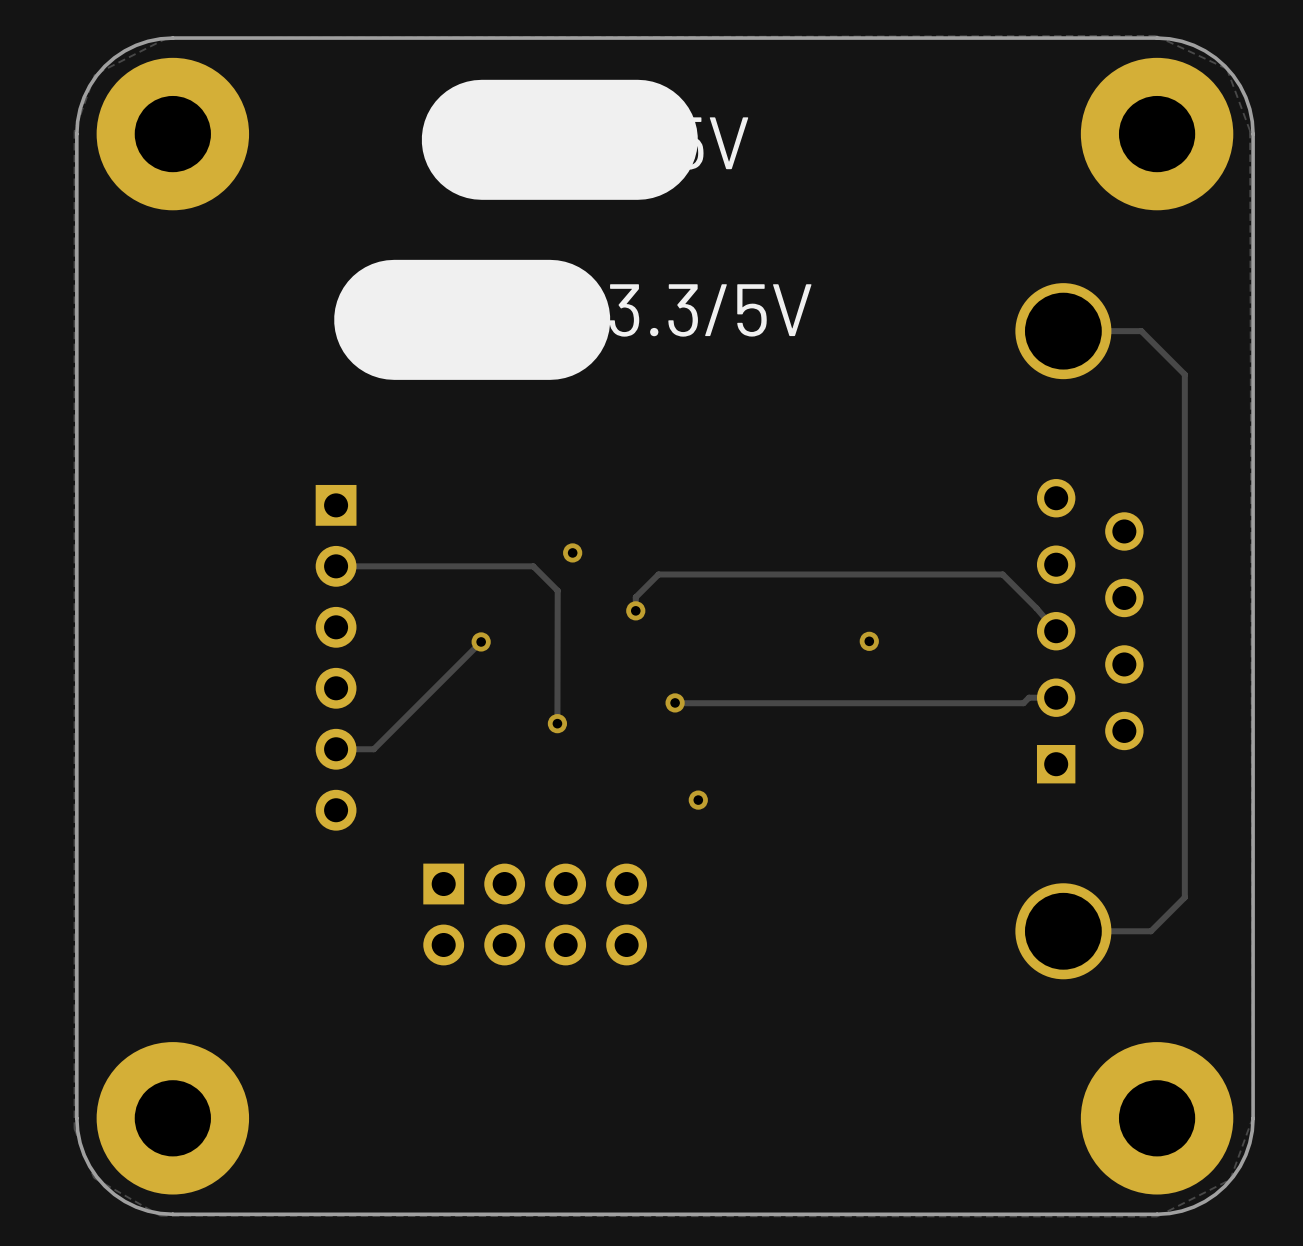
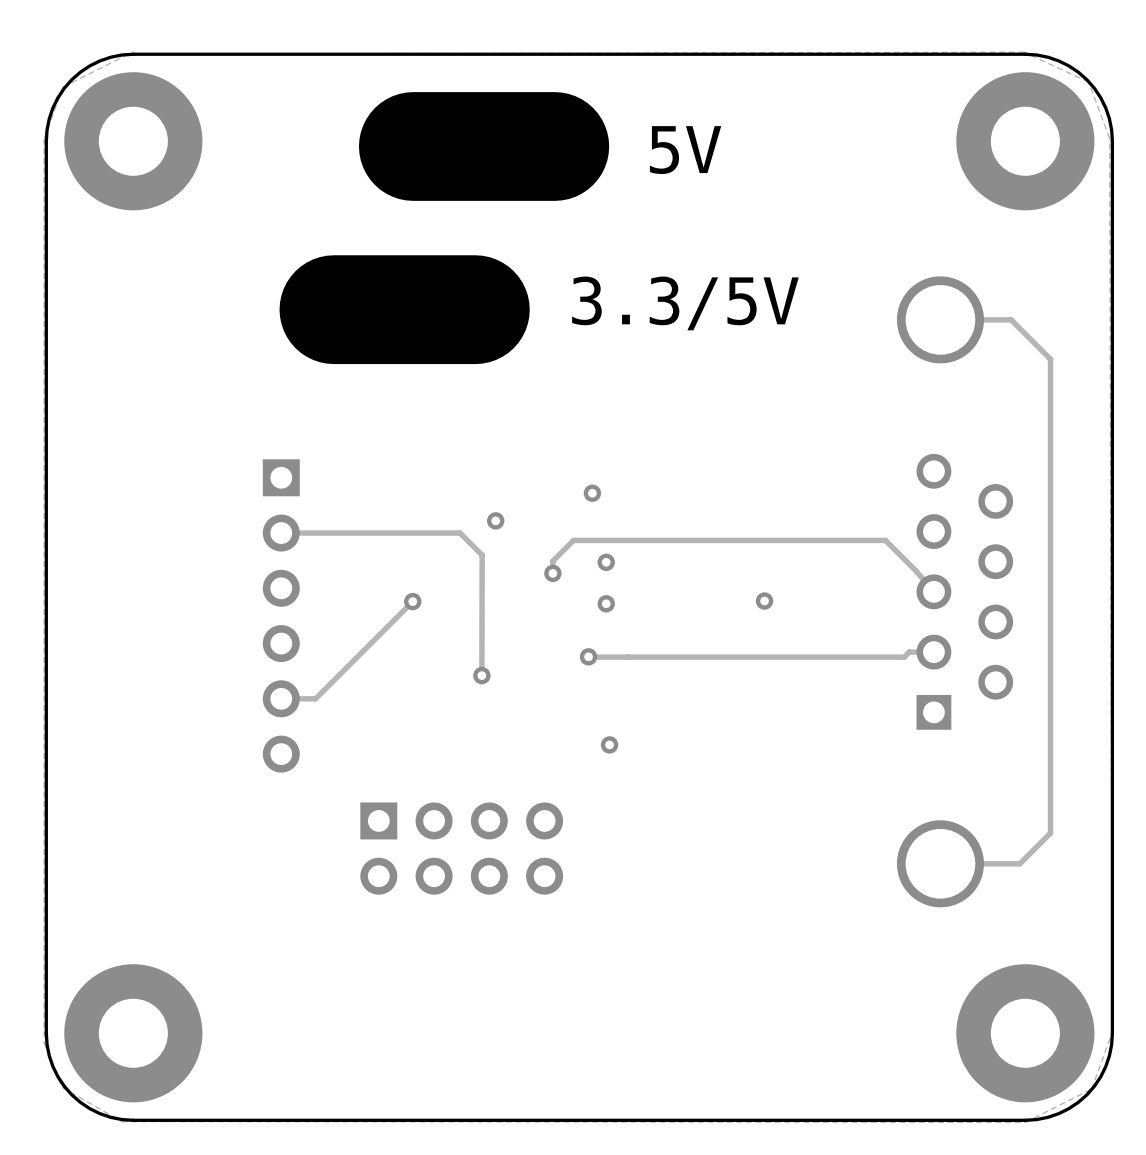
via: none -> (592, 493)
via: none -> (606, 562)
via: none -> (606, 603)

